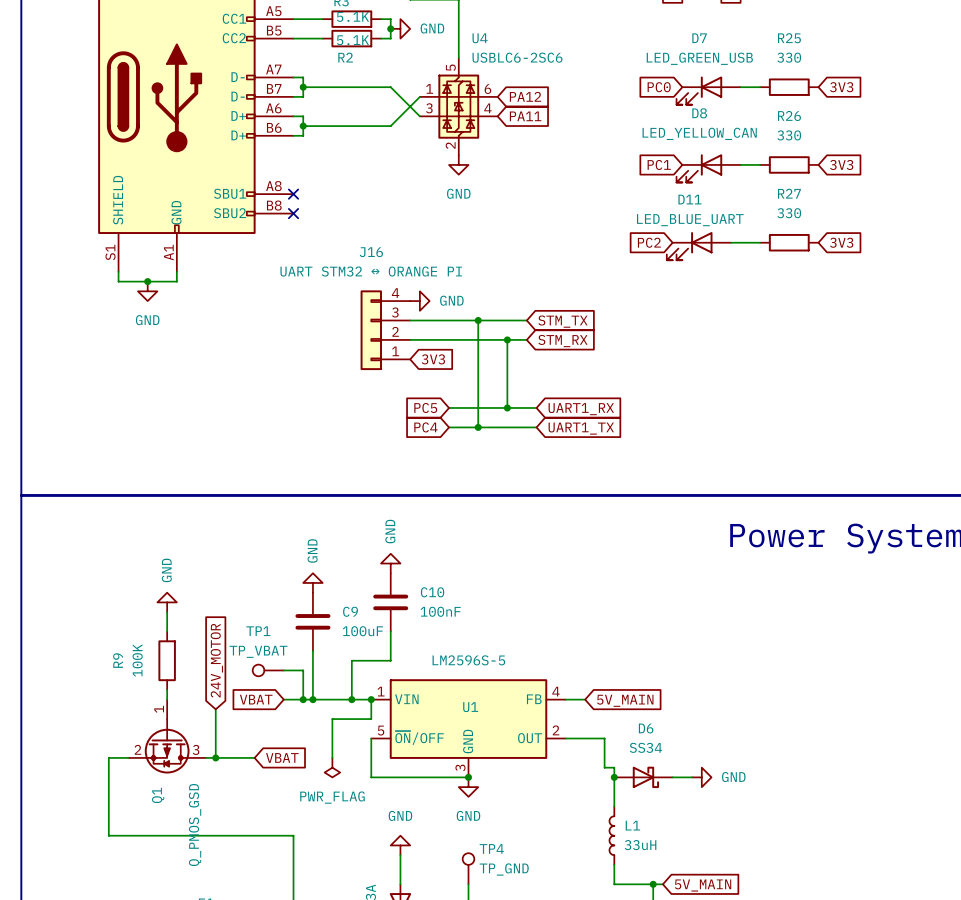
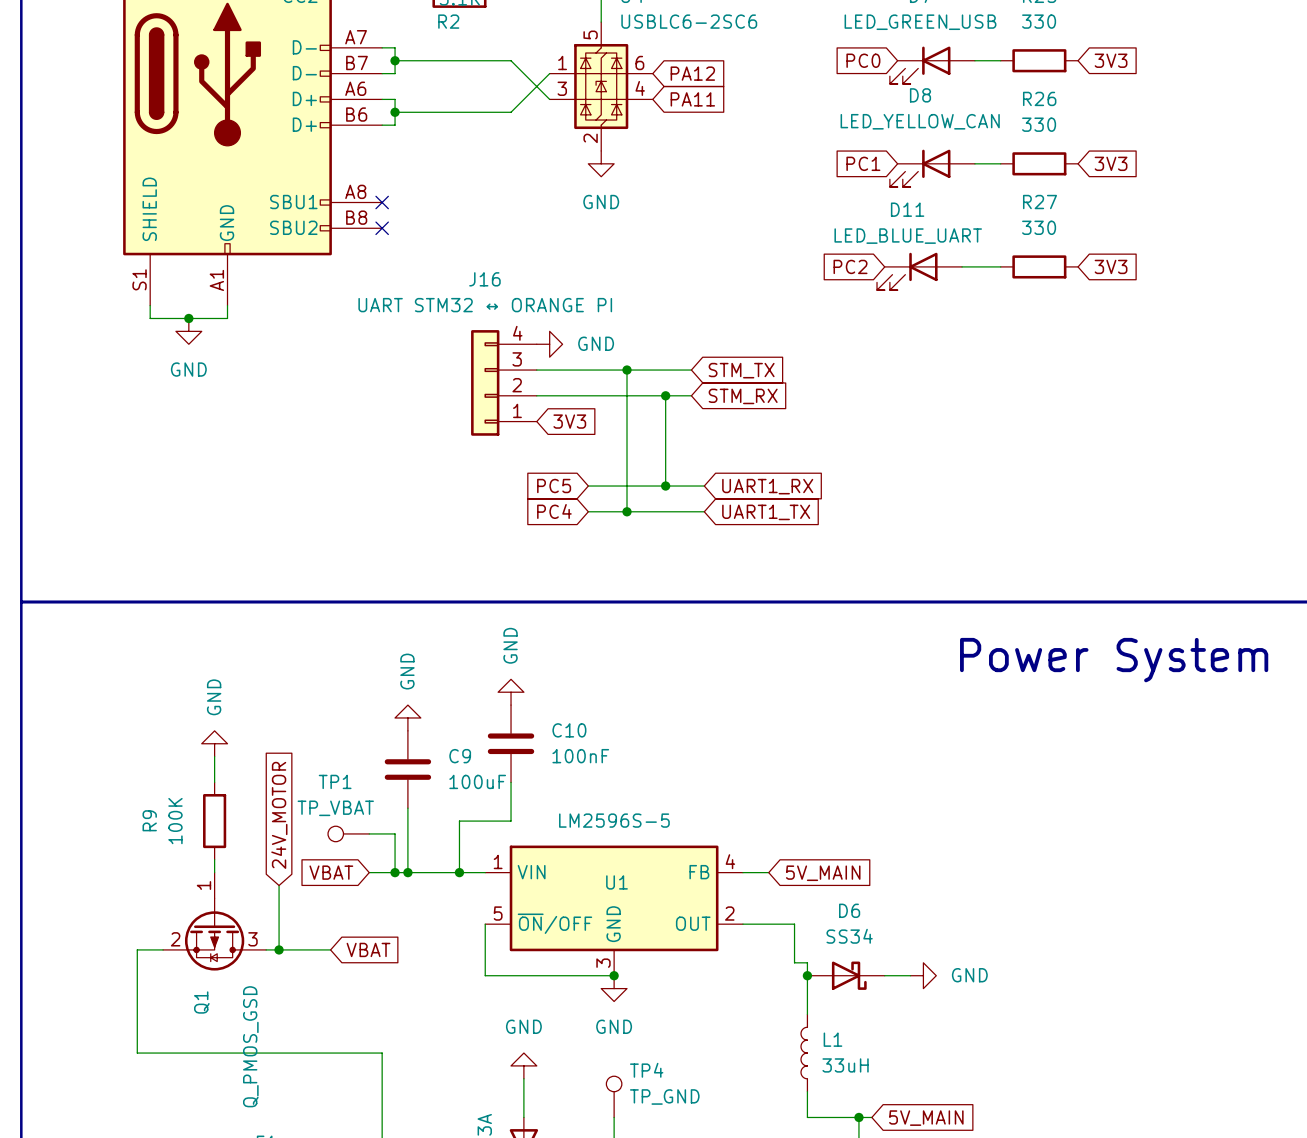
wire: (371, 699) (371, 719) (332, 719) (332, 757) -> none
junction: (371, 699) -> none
power symbol: PWR_FLAG (332, 767) -> none

